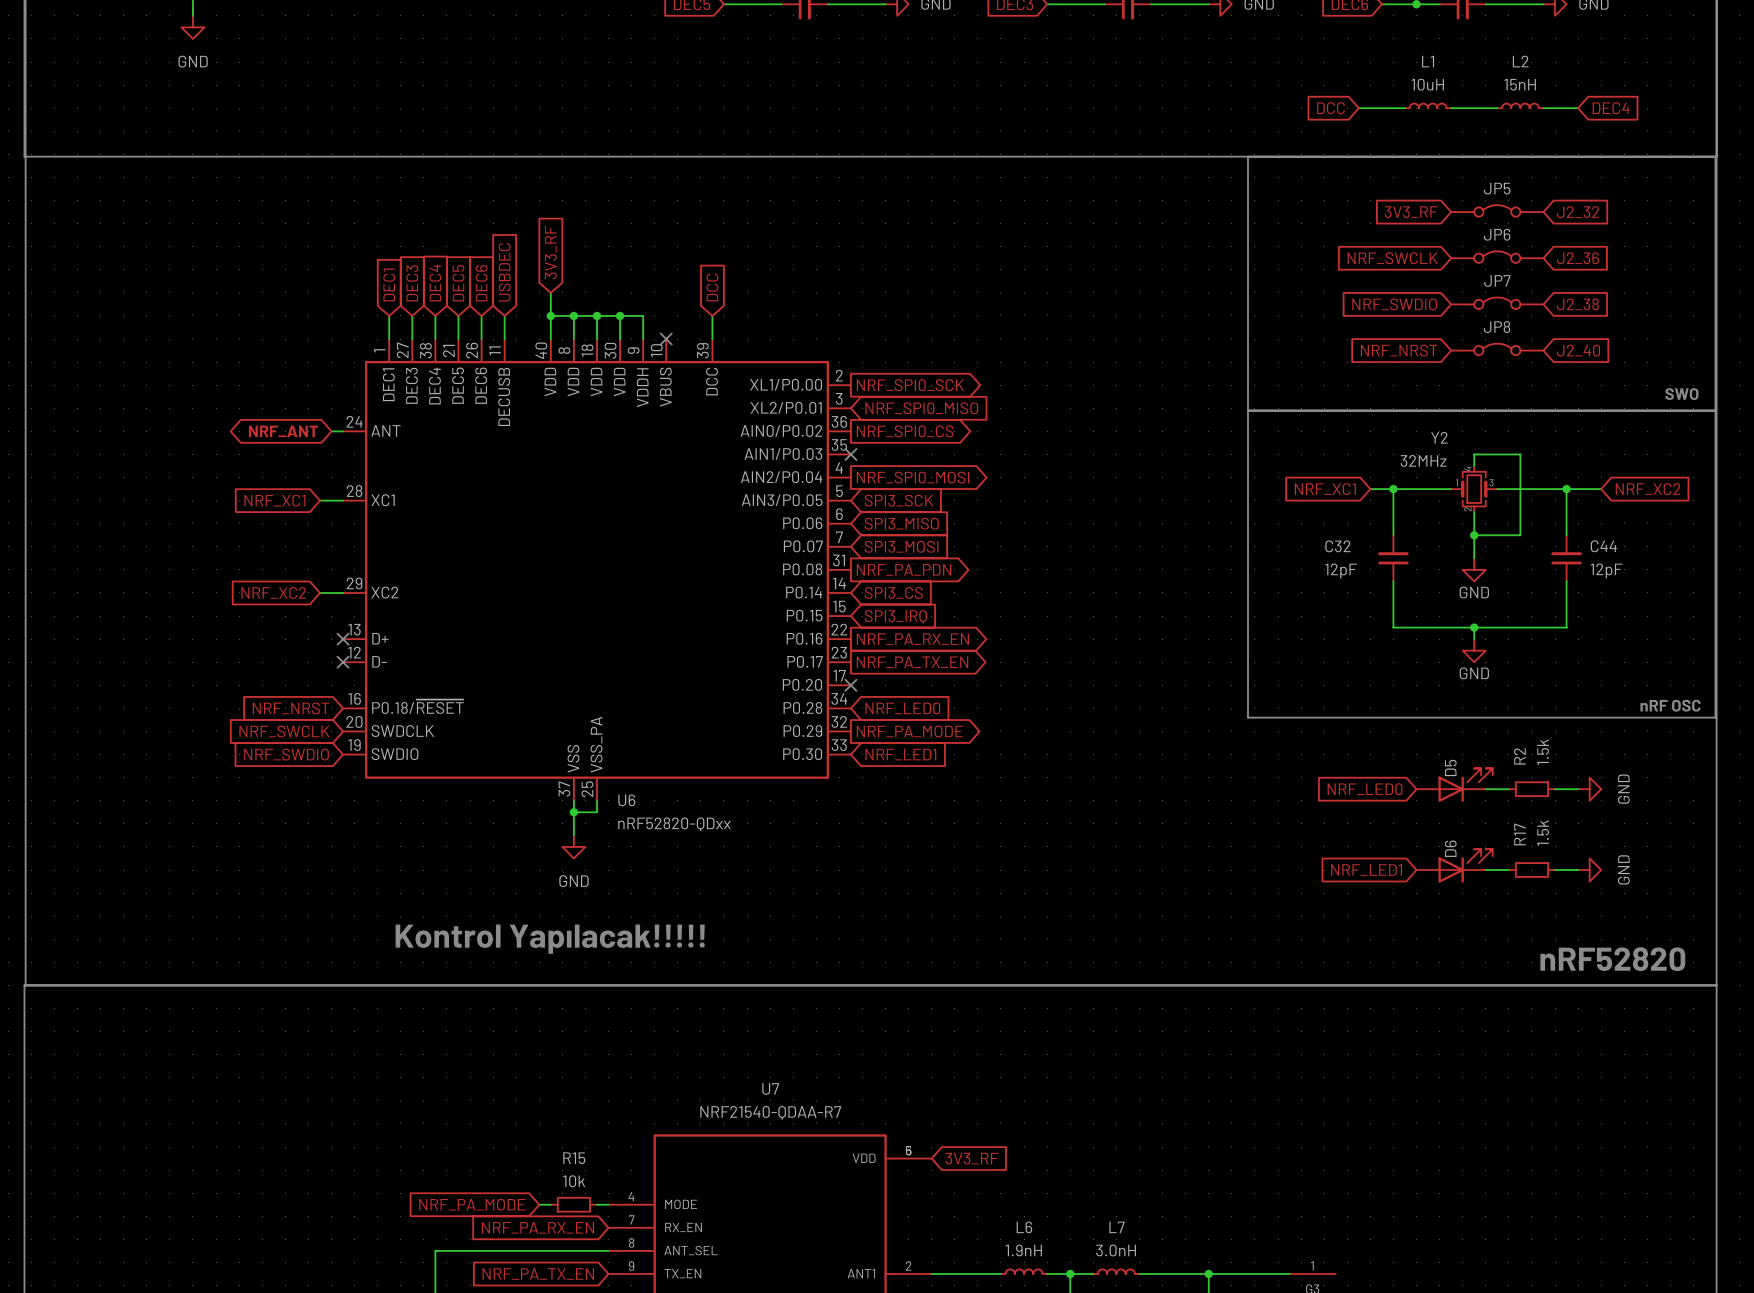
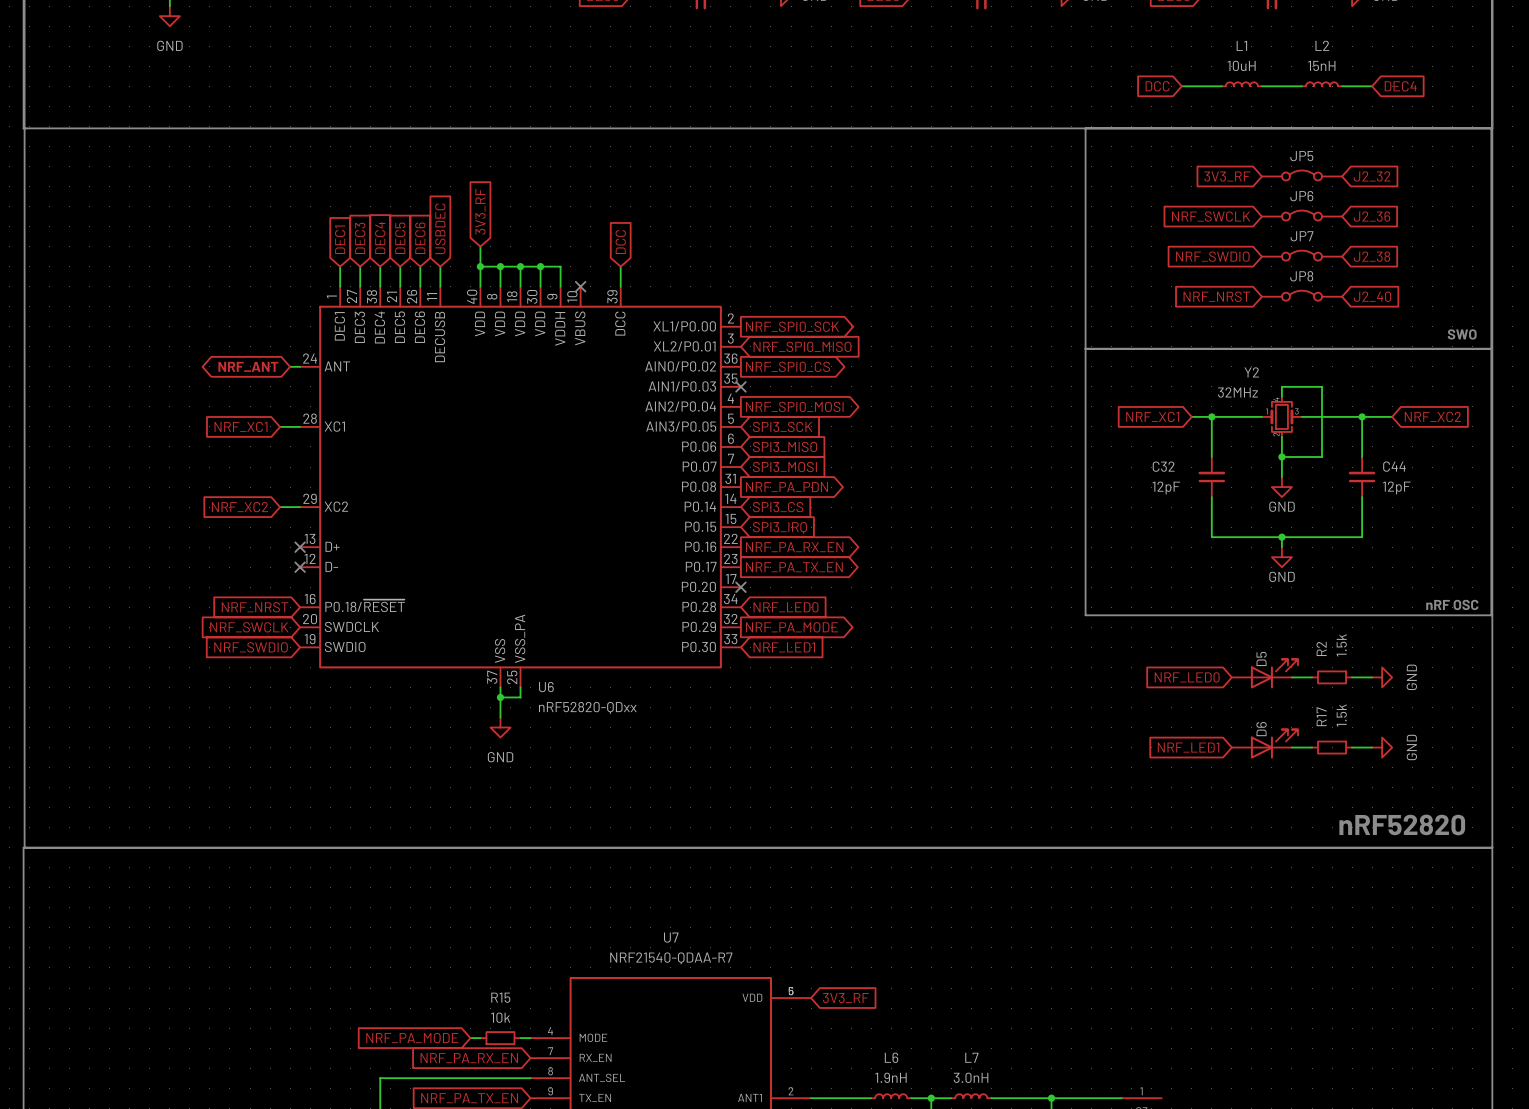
text: Kontrol Yapılacak!!!!! (550, 939) -> none

